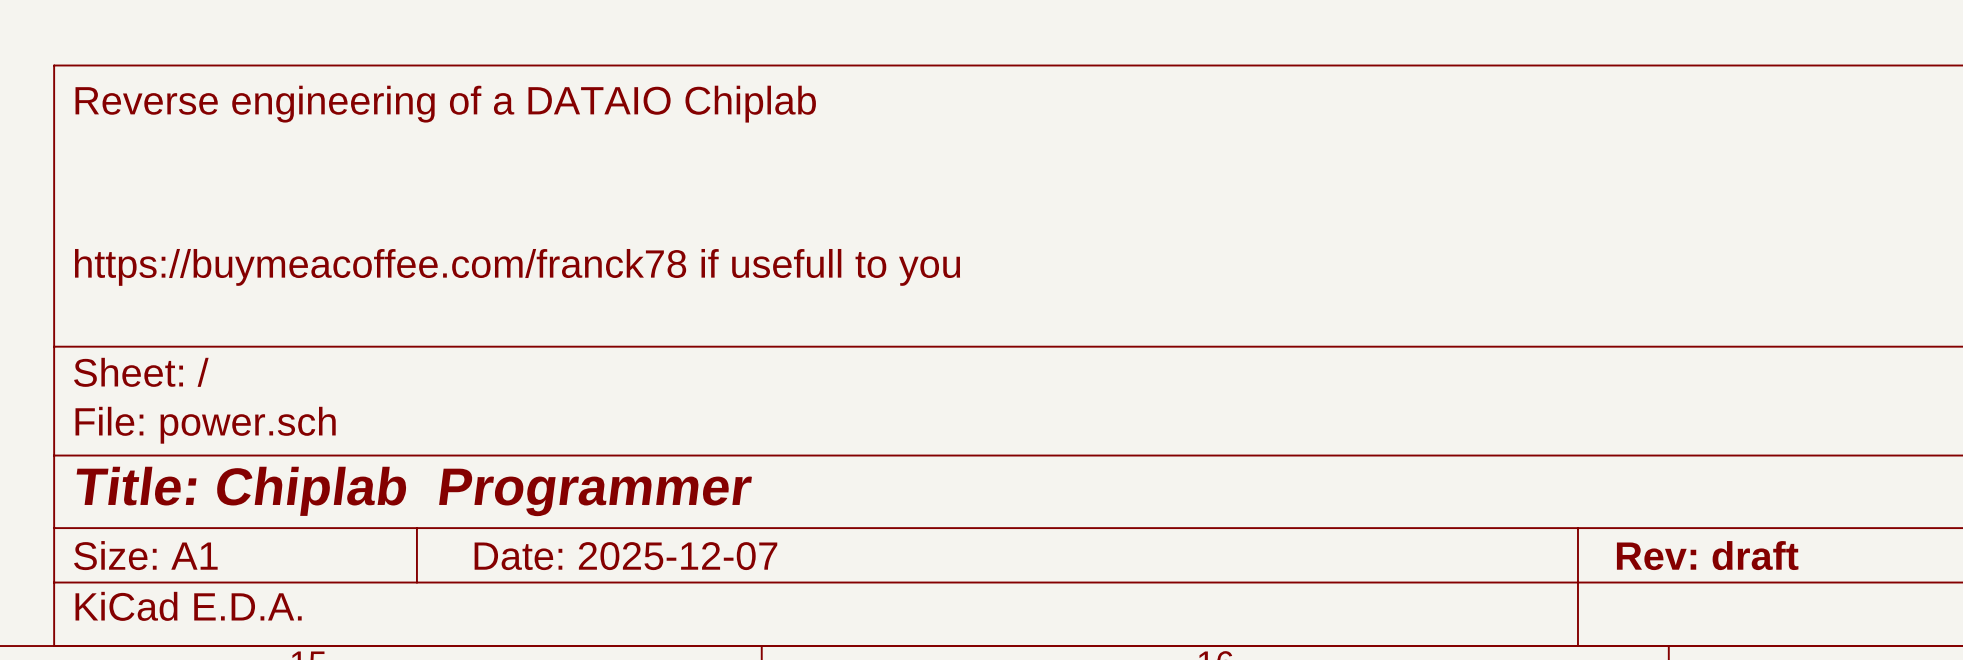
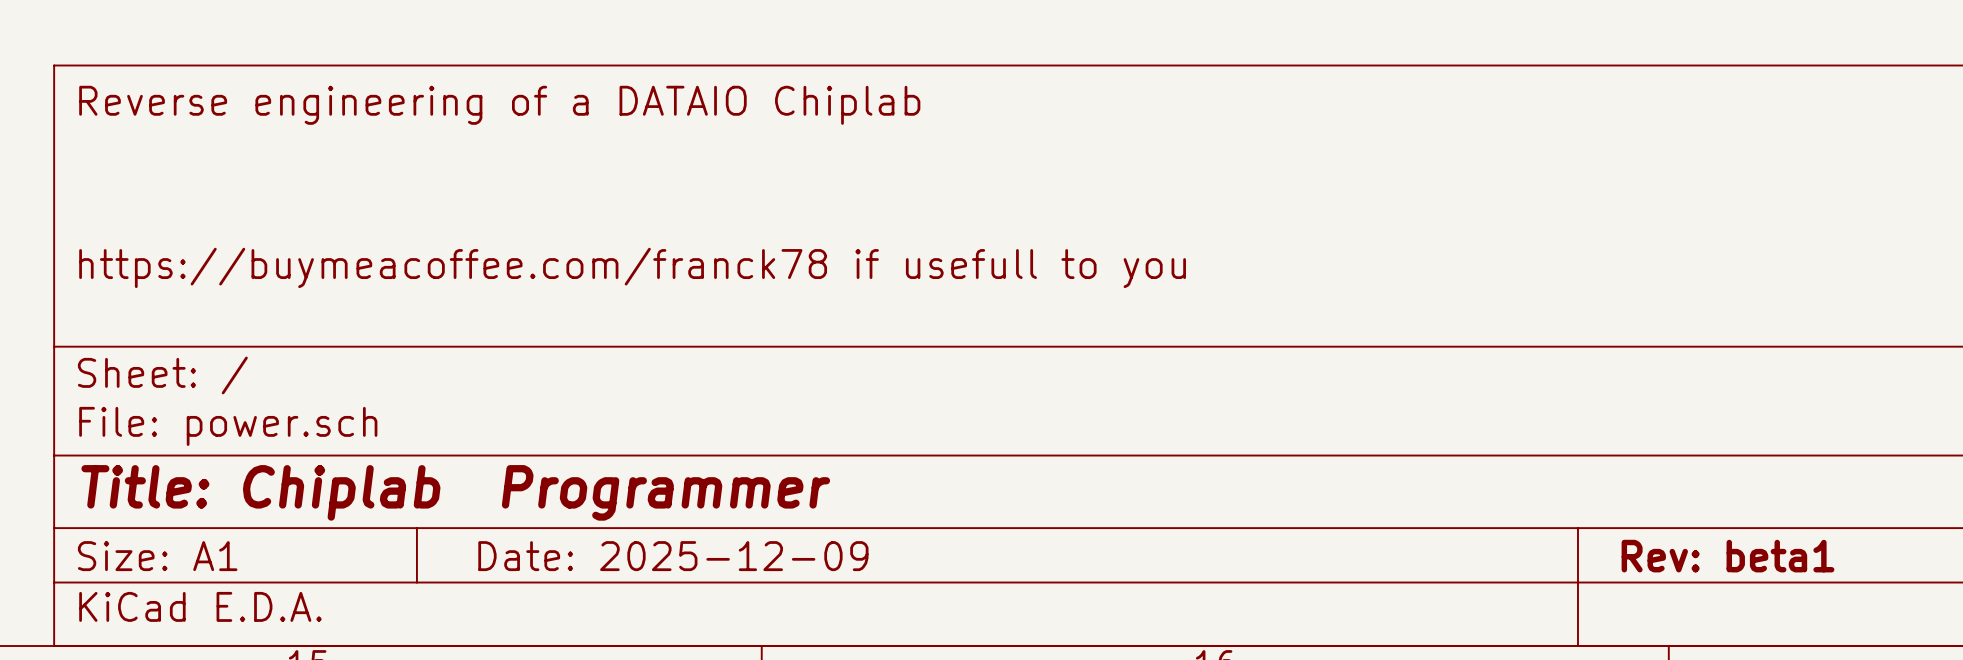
title block: Rev: draft (1707, 555) -> Rev: beta1 (1727, 556)
title block: Date: 2025-12-07 (625, 556) -> Date: 2025-12-09 (673, 556)

